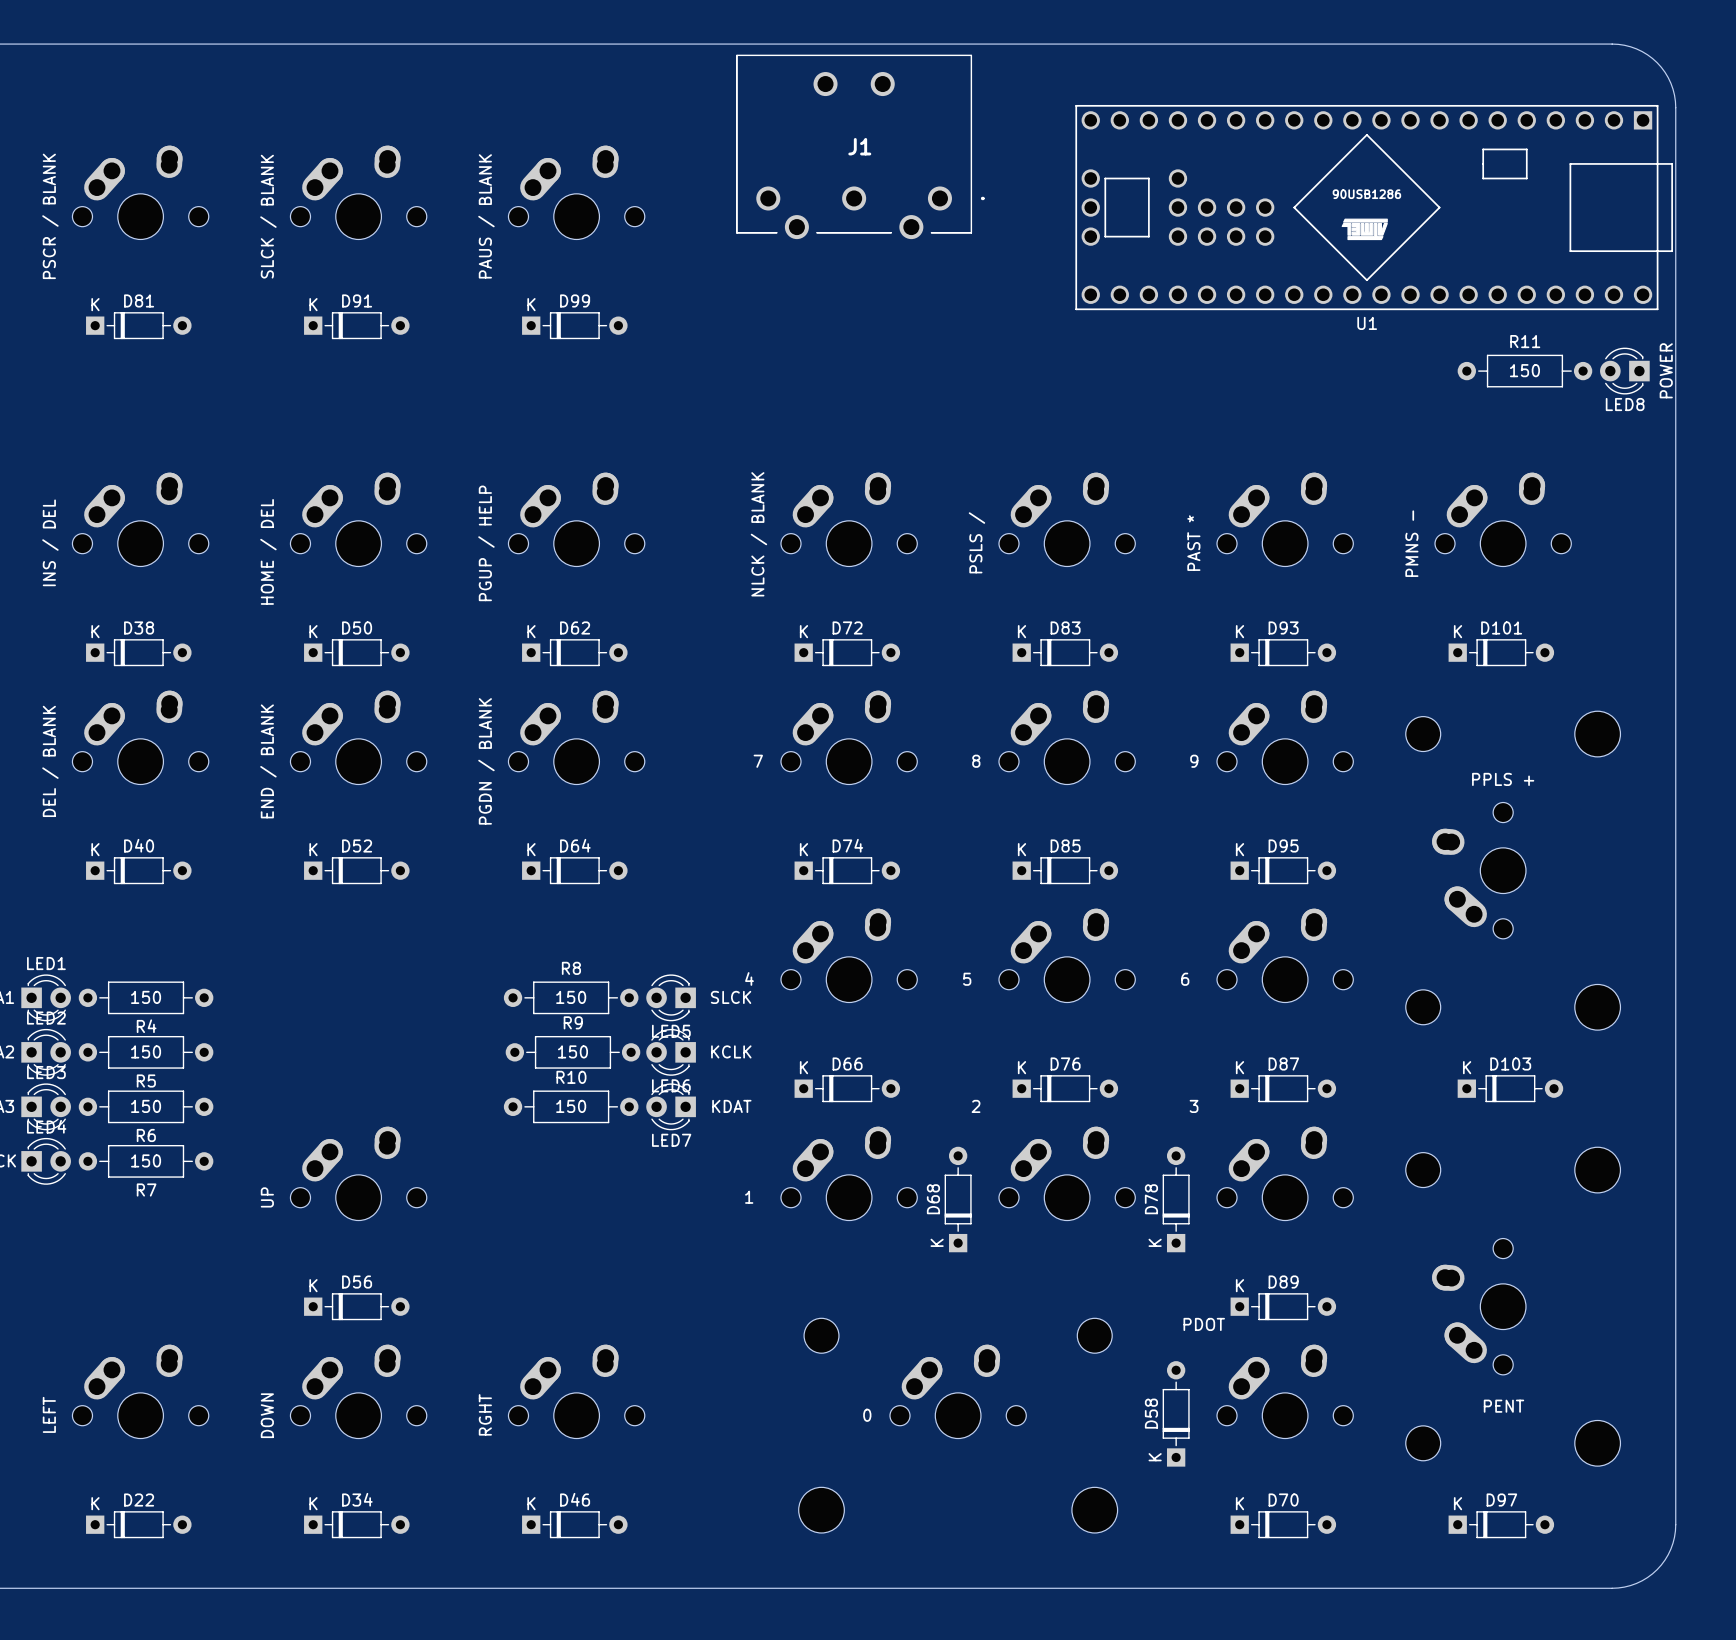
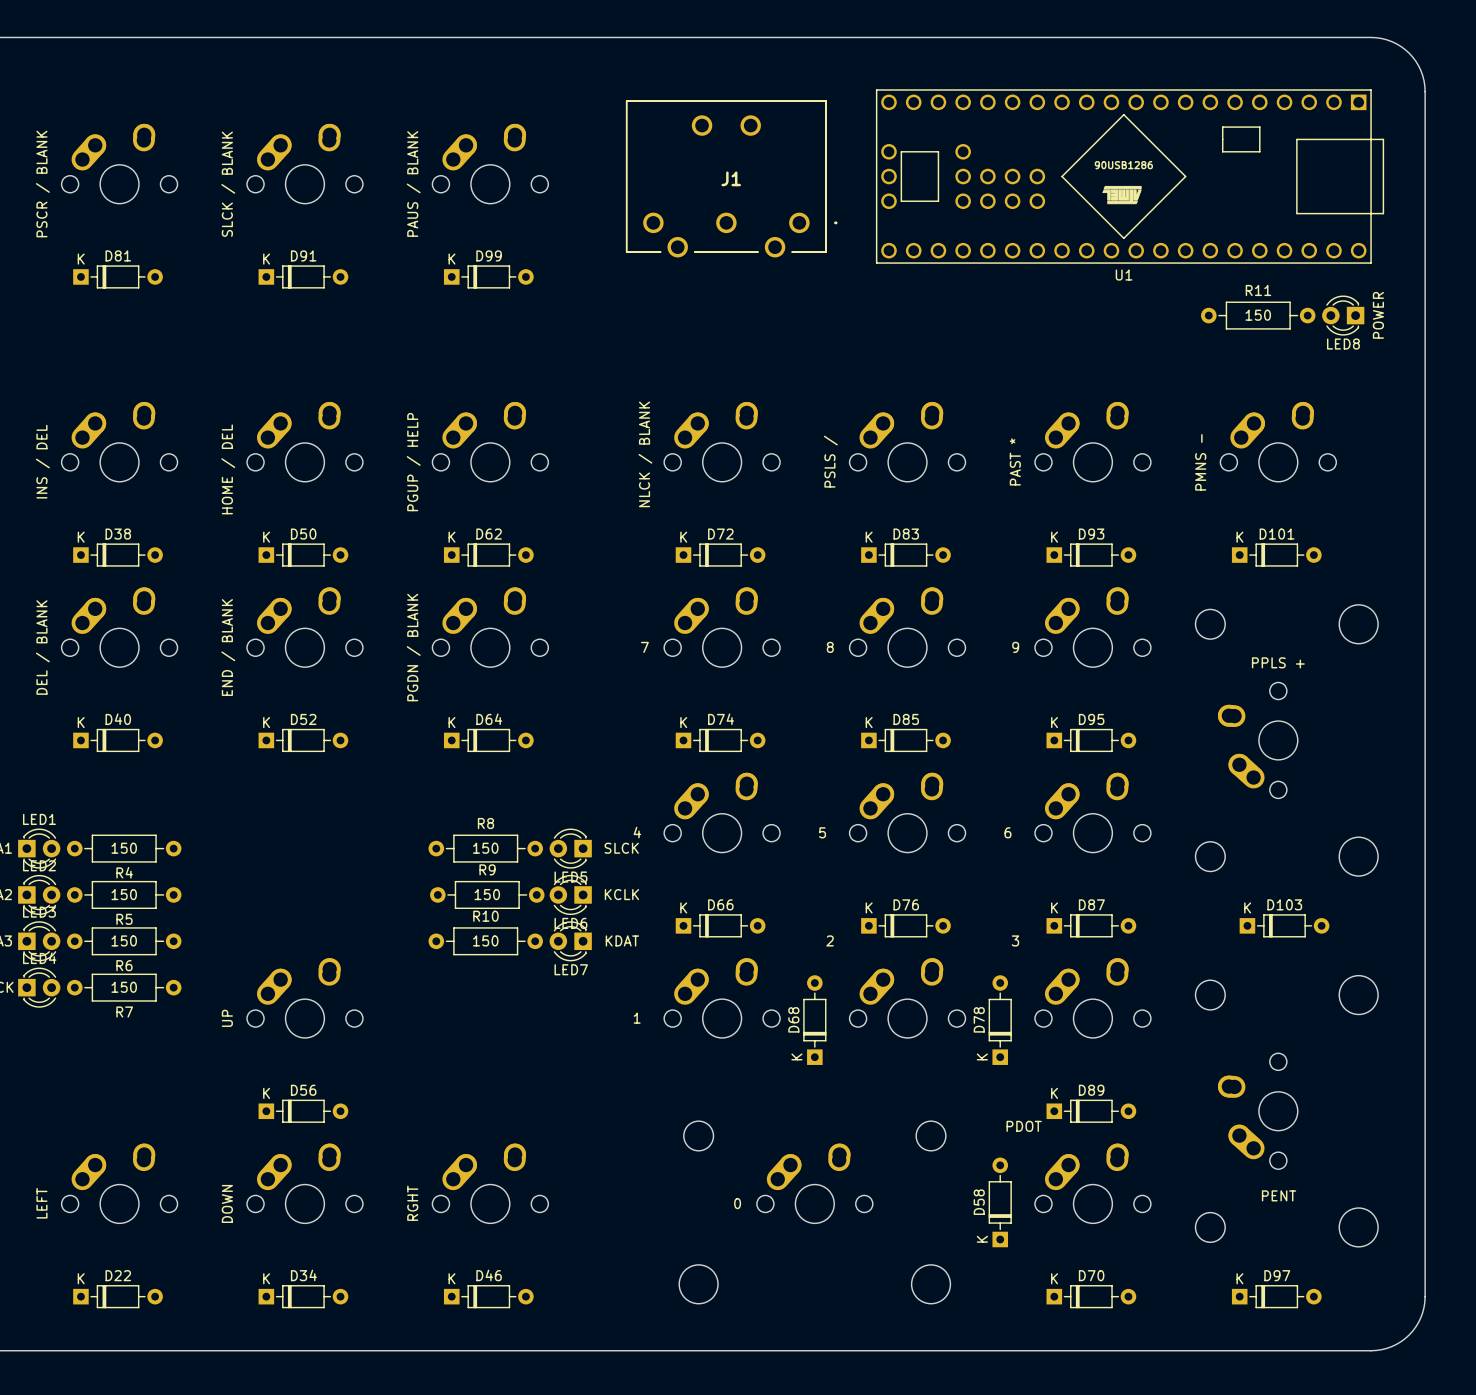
J1 position: (860, 146) -> (731, 179)
U1 position: (1374, 207) -> (1130, 176)
text position: POWER (1666, 370) -> POWER (1378, 315)
R11 position: (1524, 371) -> (1258, 315)
LED8 position: (1624, 371) -> (1343, 315)

